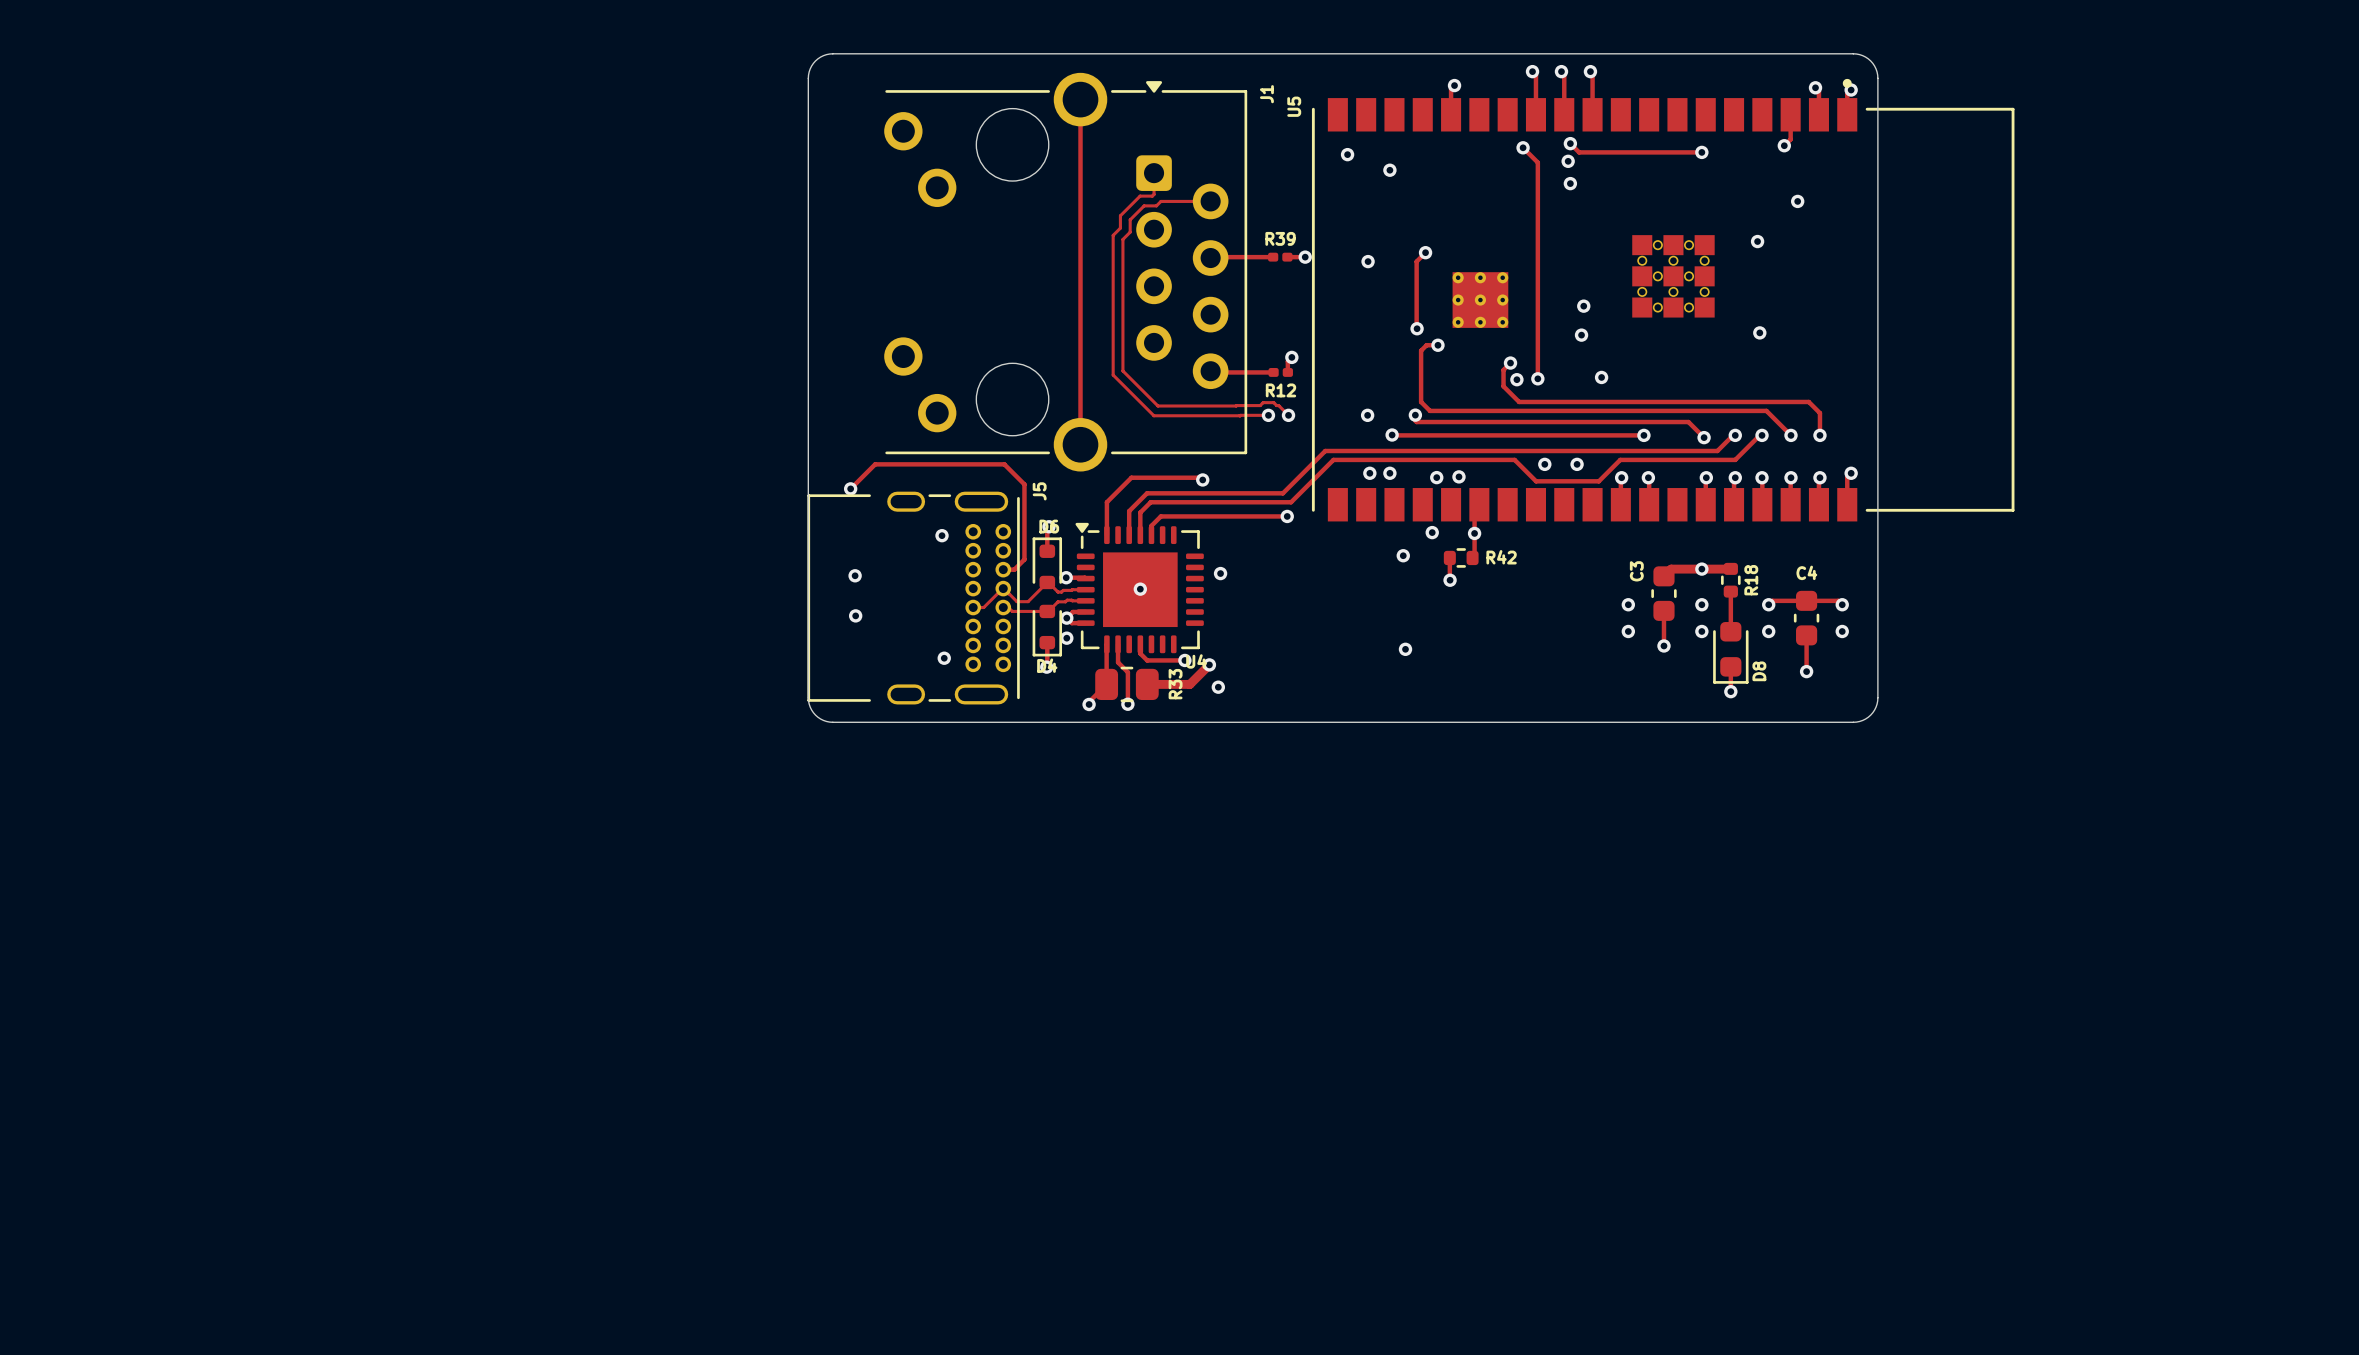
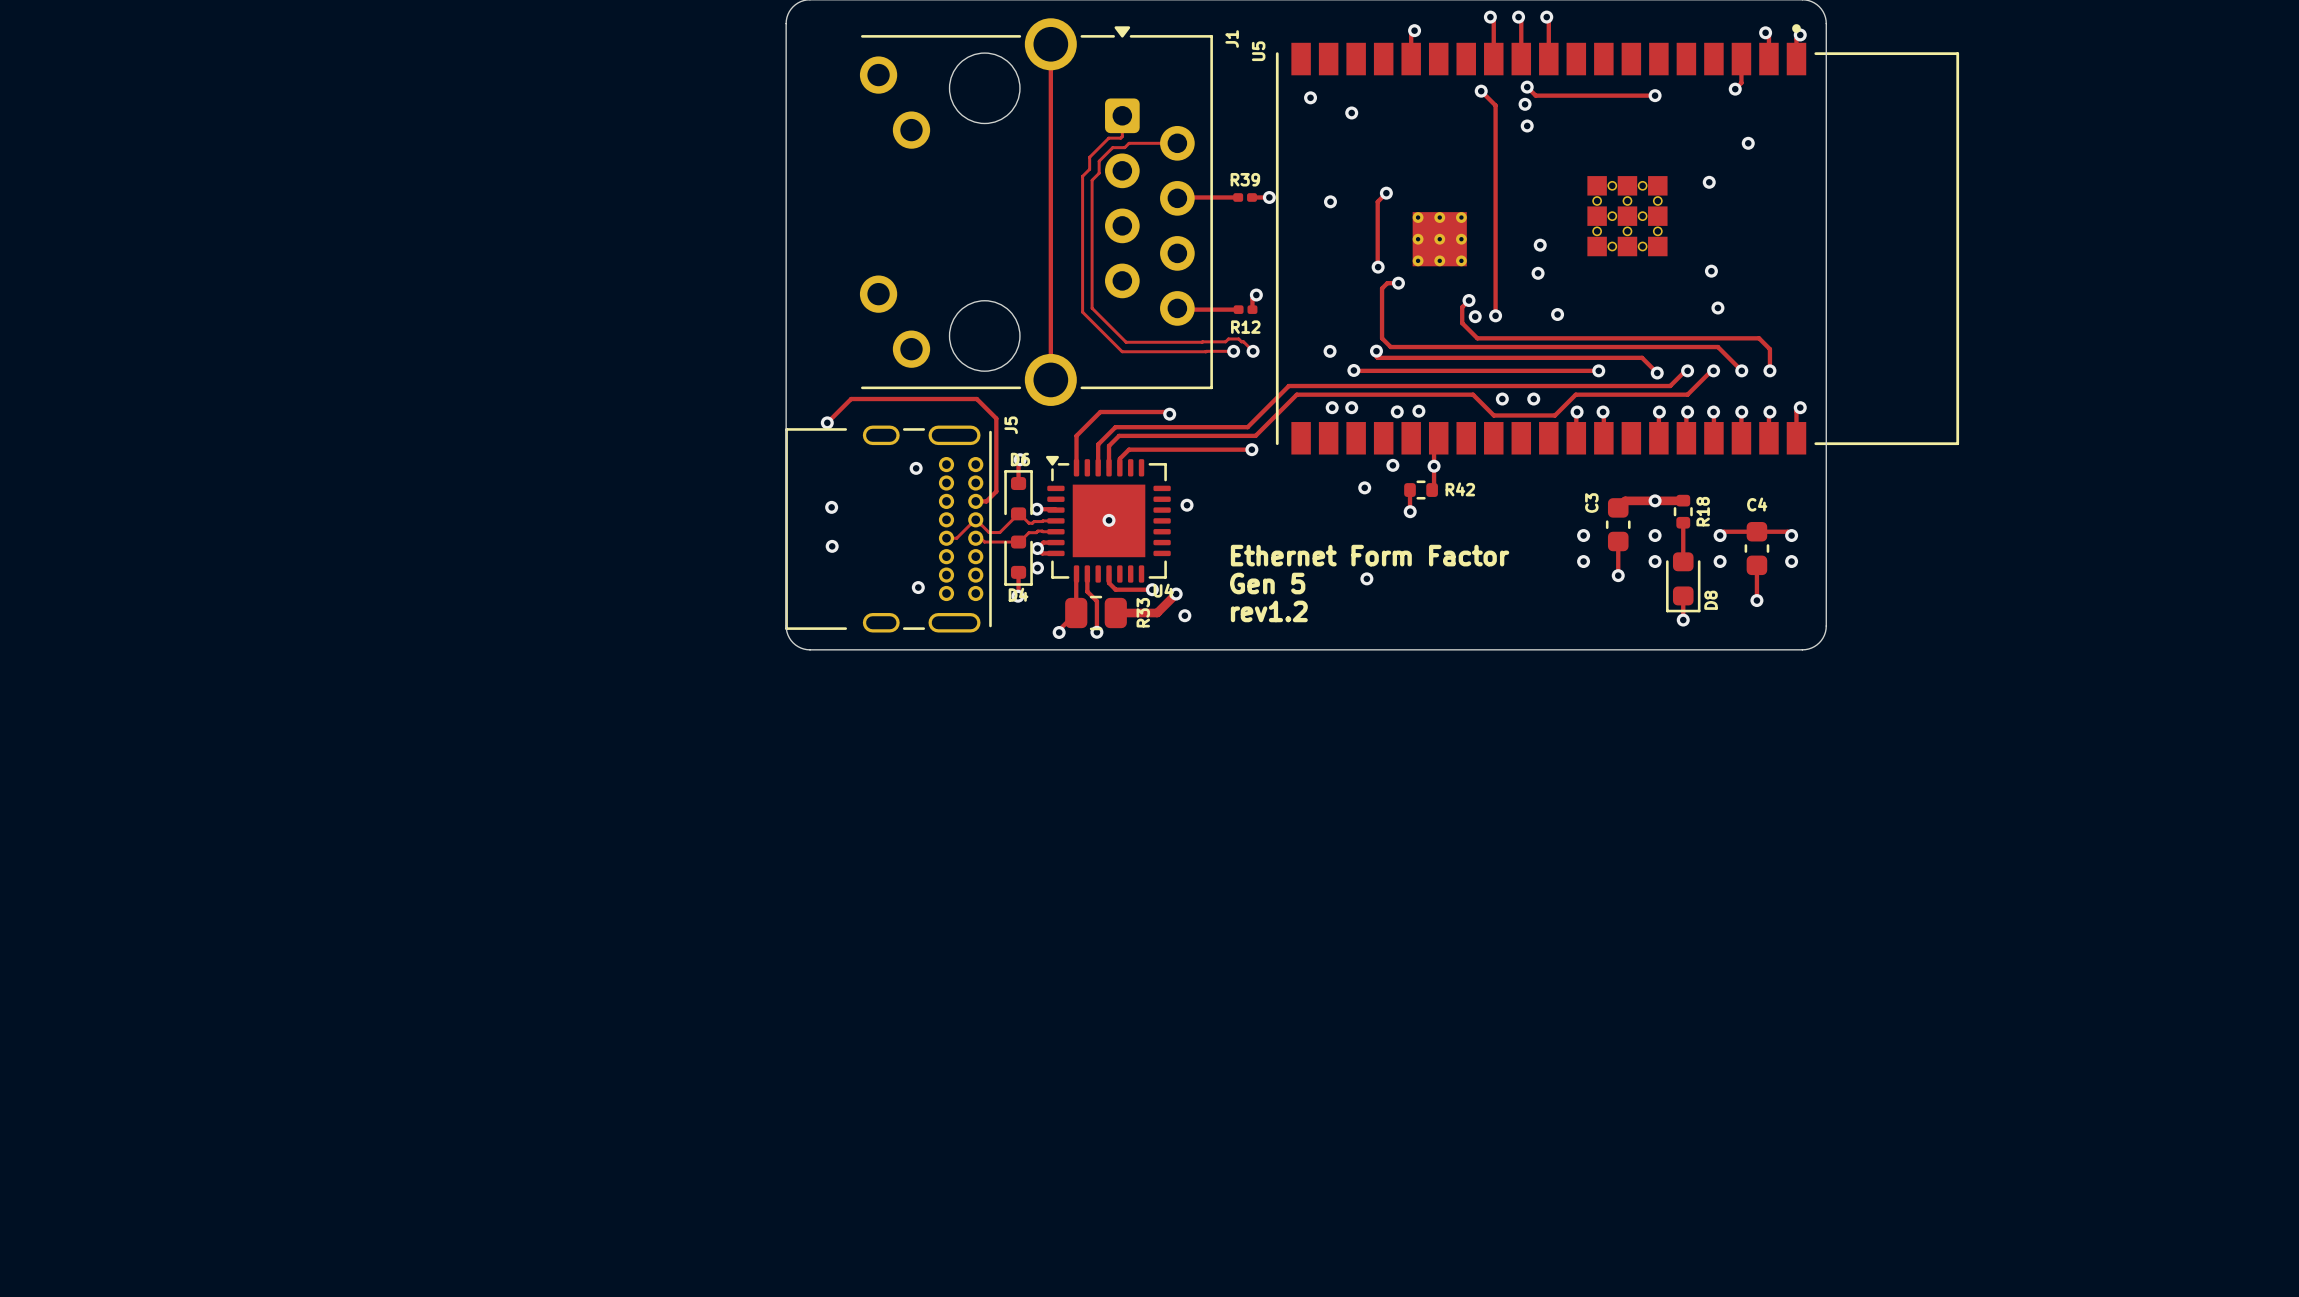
via: none -> (1717, 308)
text: none -> Ethernet Form Factor (1370, 555)
text: none -> Gen 5 (1267, 583)
text: none -> rev1.2 (1269, 611)

